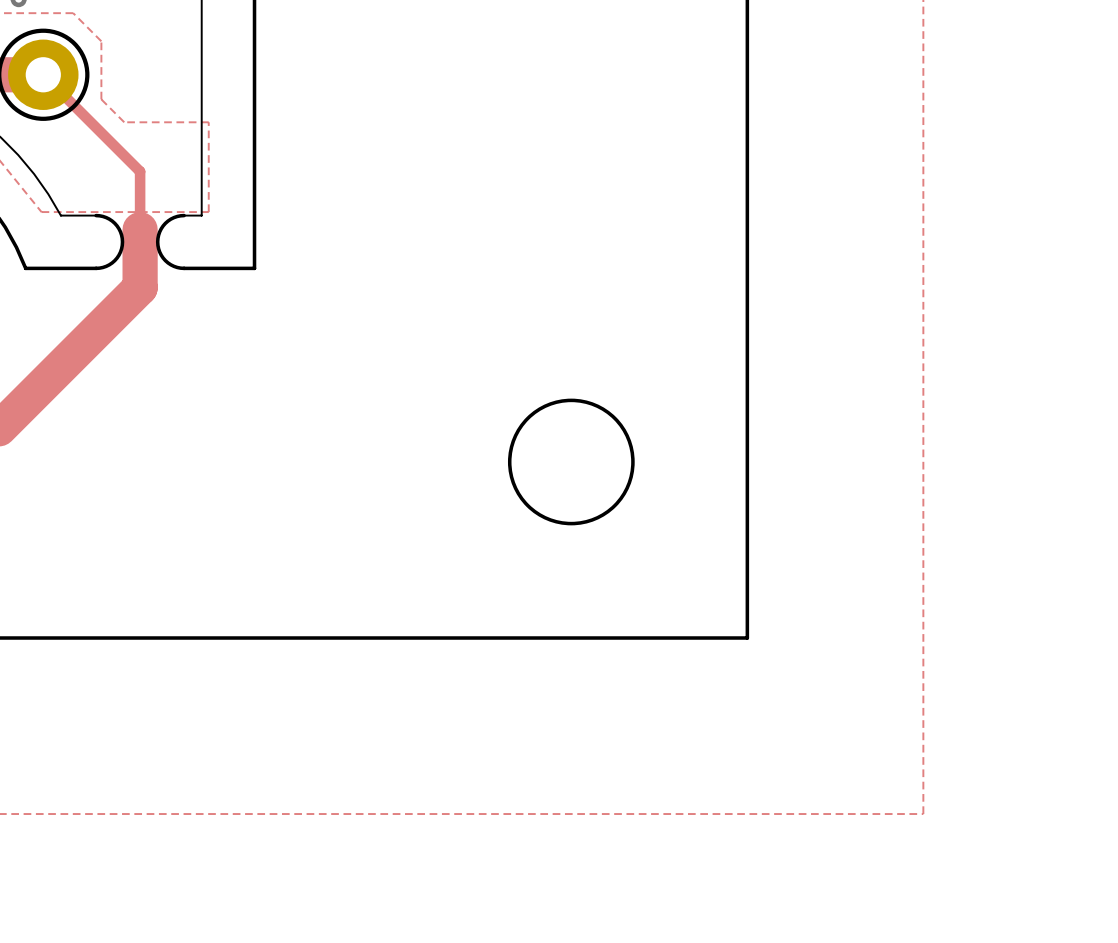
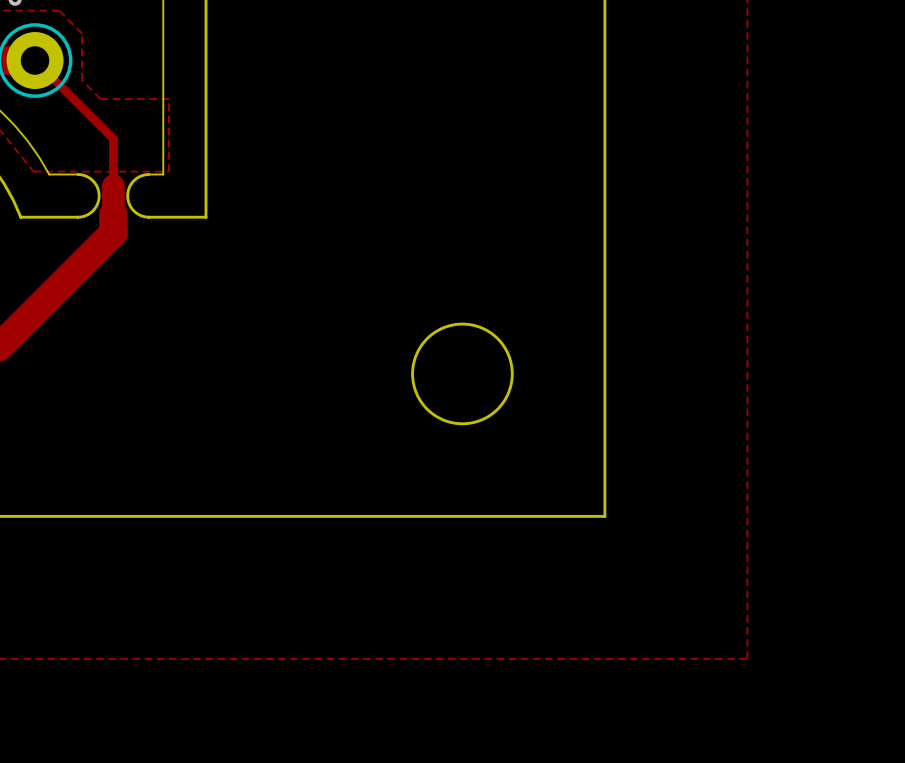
track width: thick (140, 229) (140, 264) -> thin (113, 185) (113, 214)

